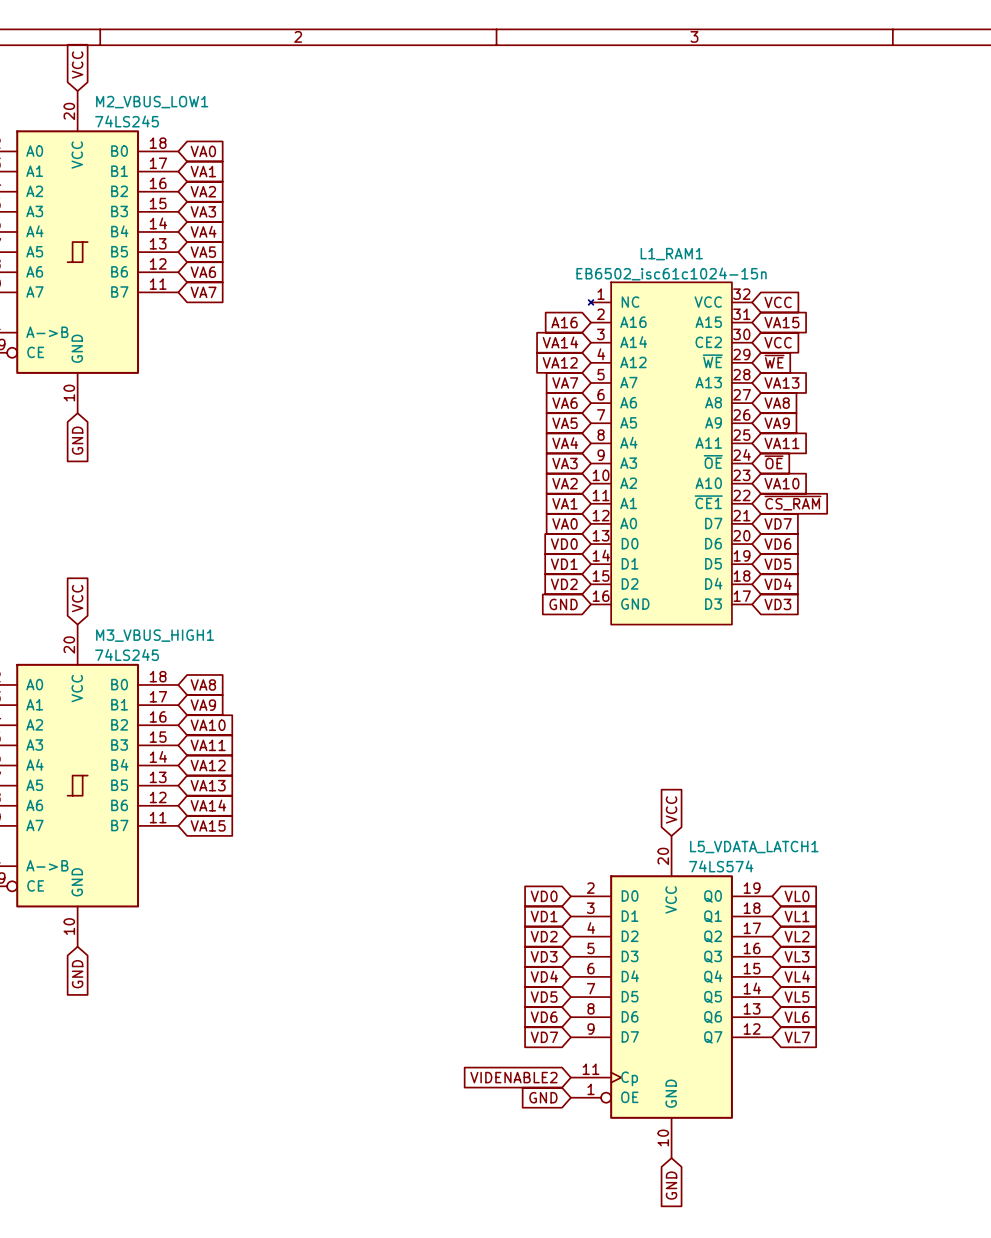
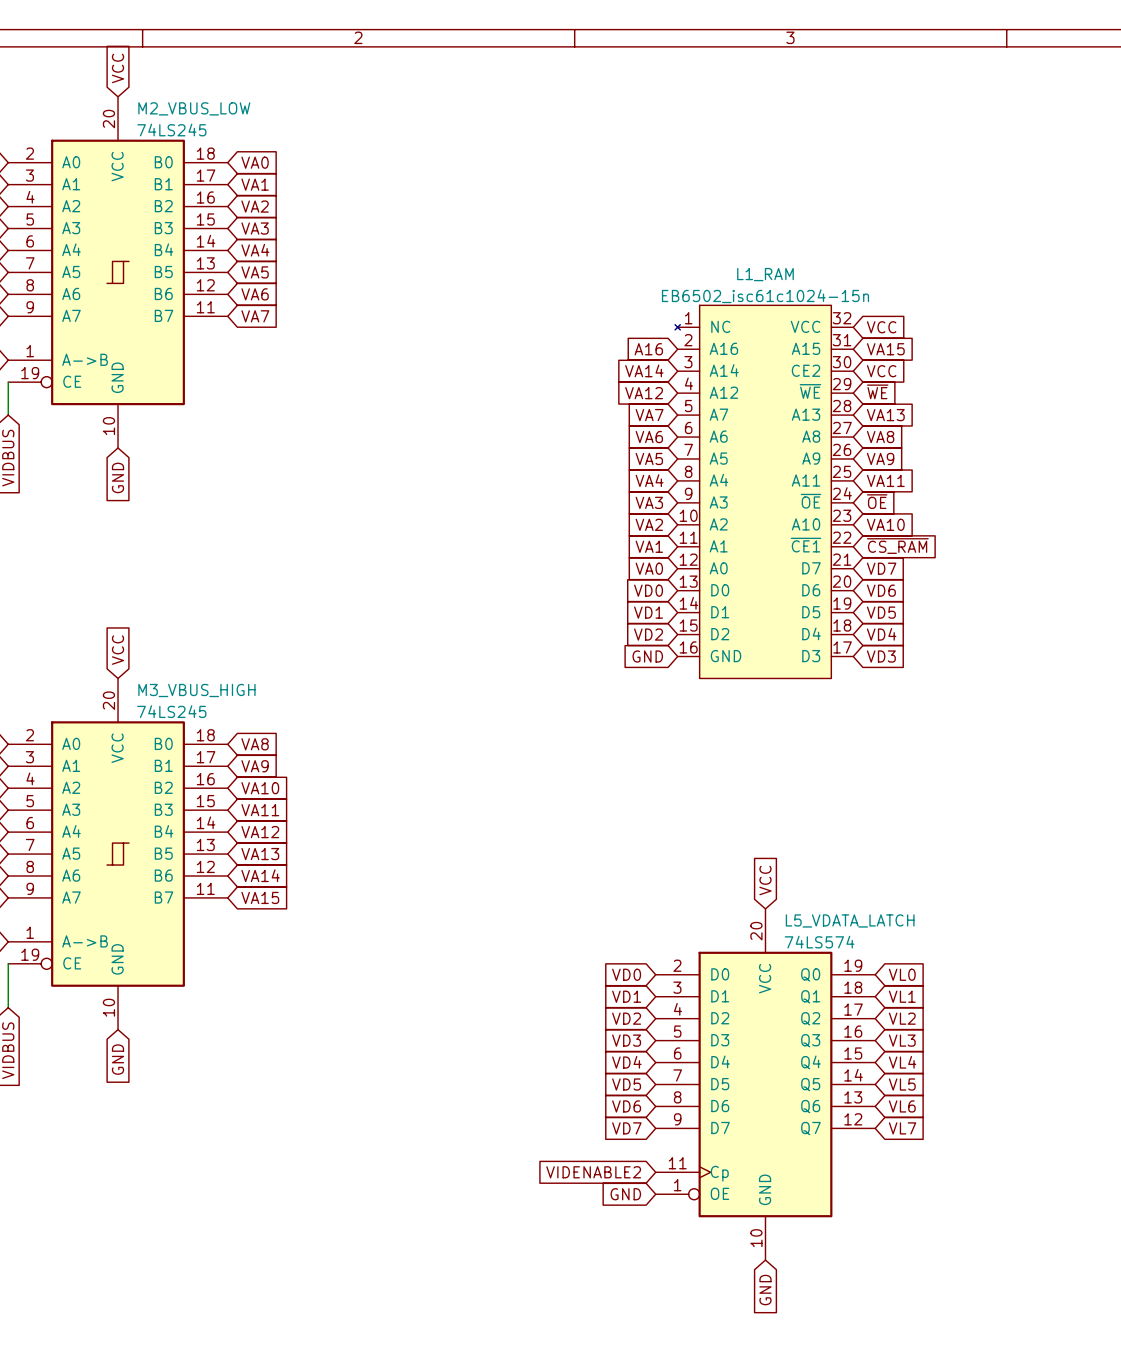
M2_VBUS_LOW1 name: M2_VBUS_LOW1 (152, 102) -> M2_VBUS_LOW (194, 108)
L1_RAM1 name: L1_RAM1 (671, 254) -> L1_RAM (765, 274)
M3_VBUS_HIGH1 name: M3_VBUS_HIGH1 (155, 635) -> M3_VBUS_HIGH (196, 690)
L5_VDATA_LATCH1 name: L5_VDATA_LATCH1 (754, 847) -> L5_VDATA_LATCH (850, 920)

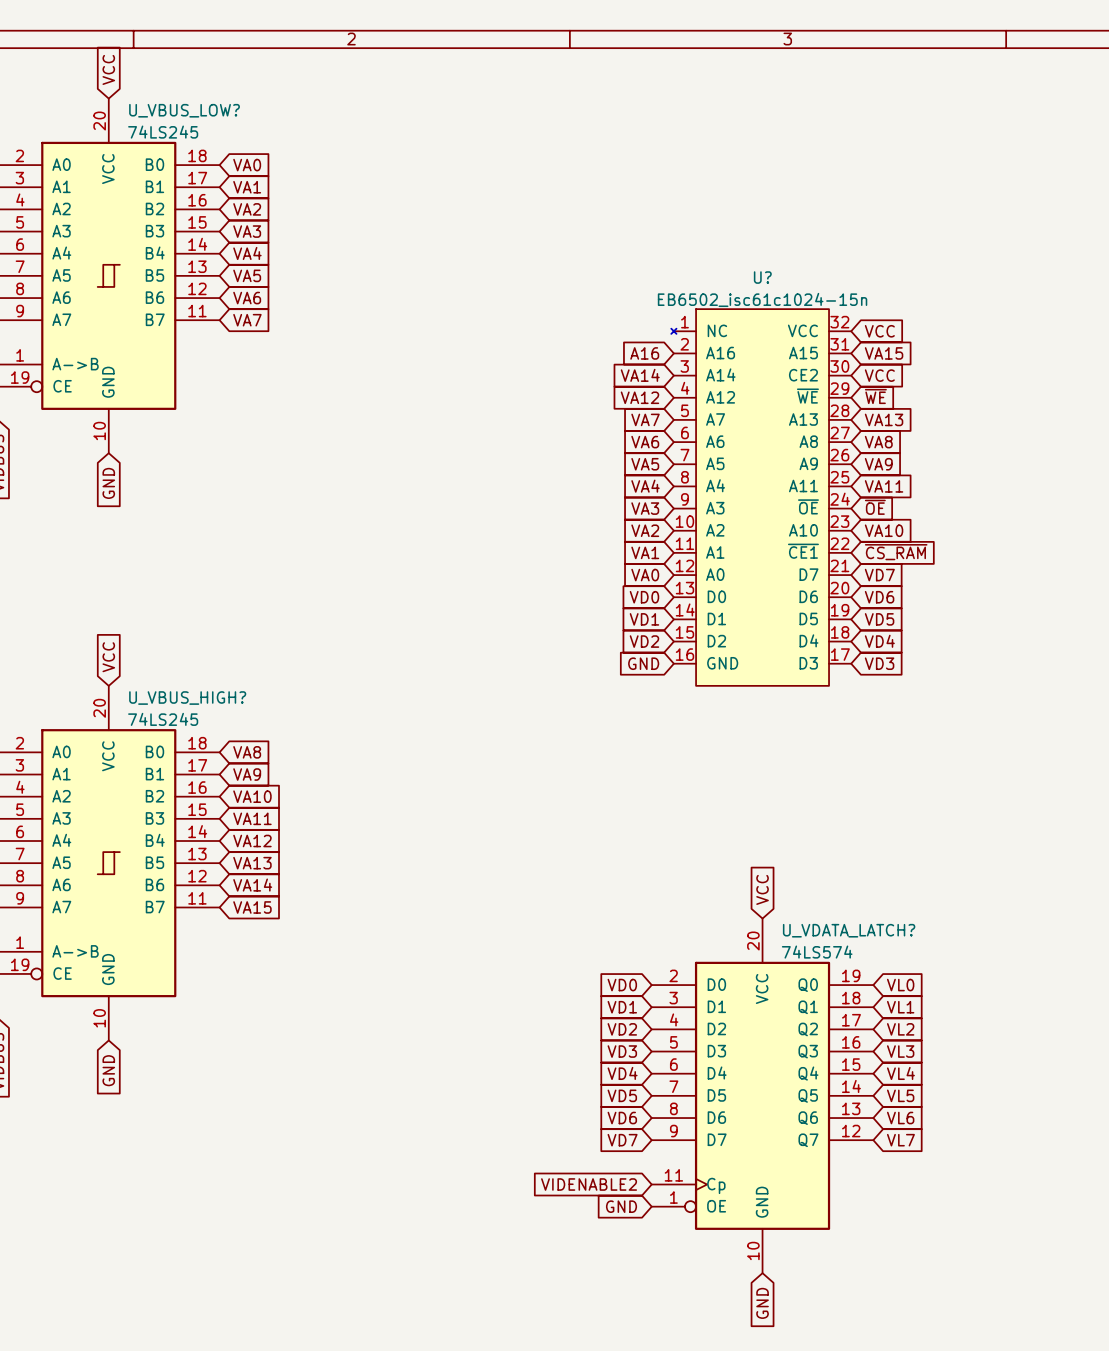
M2_VBUS_LOW name: M2_VBUS_LOW (194, 108) -> U_VBUS_LOW? (184, 110)
L1_RAM name: L1_RAM (765, 274) -> U? (762, 277)
M3_VBUS_HIGH name: M3_VBUS_HIGH (196, 690) -> U_VBUS_HIGH? (187, 698)
L5_VDATA_LATCH name: L5_VDATA_LATCH (850, 920) -> U_VDATA_LATCH? (849, 930)

